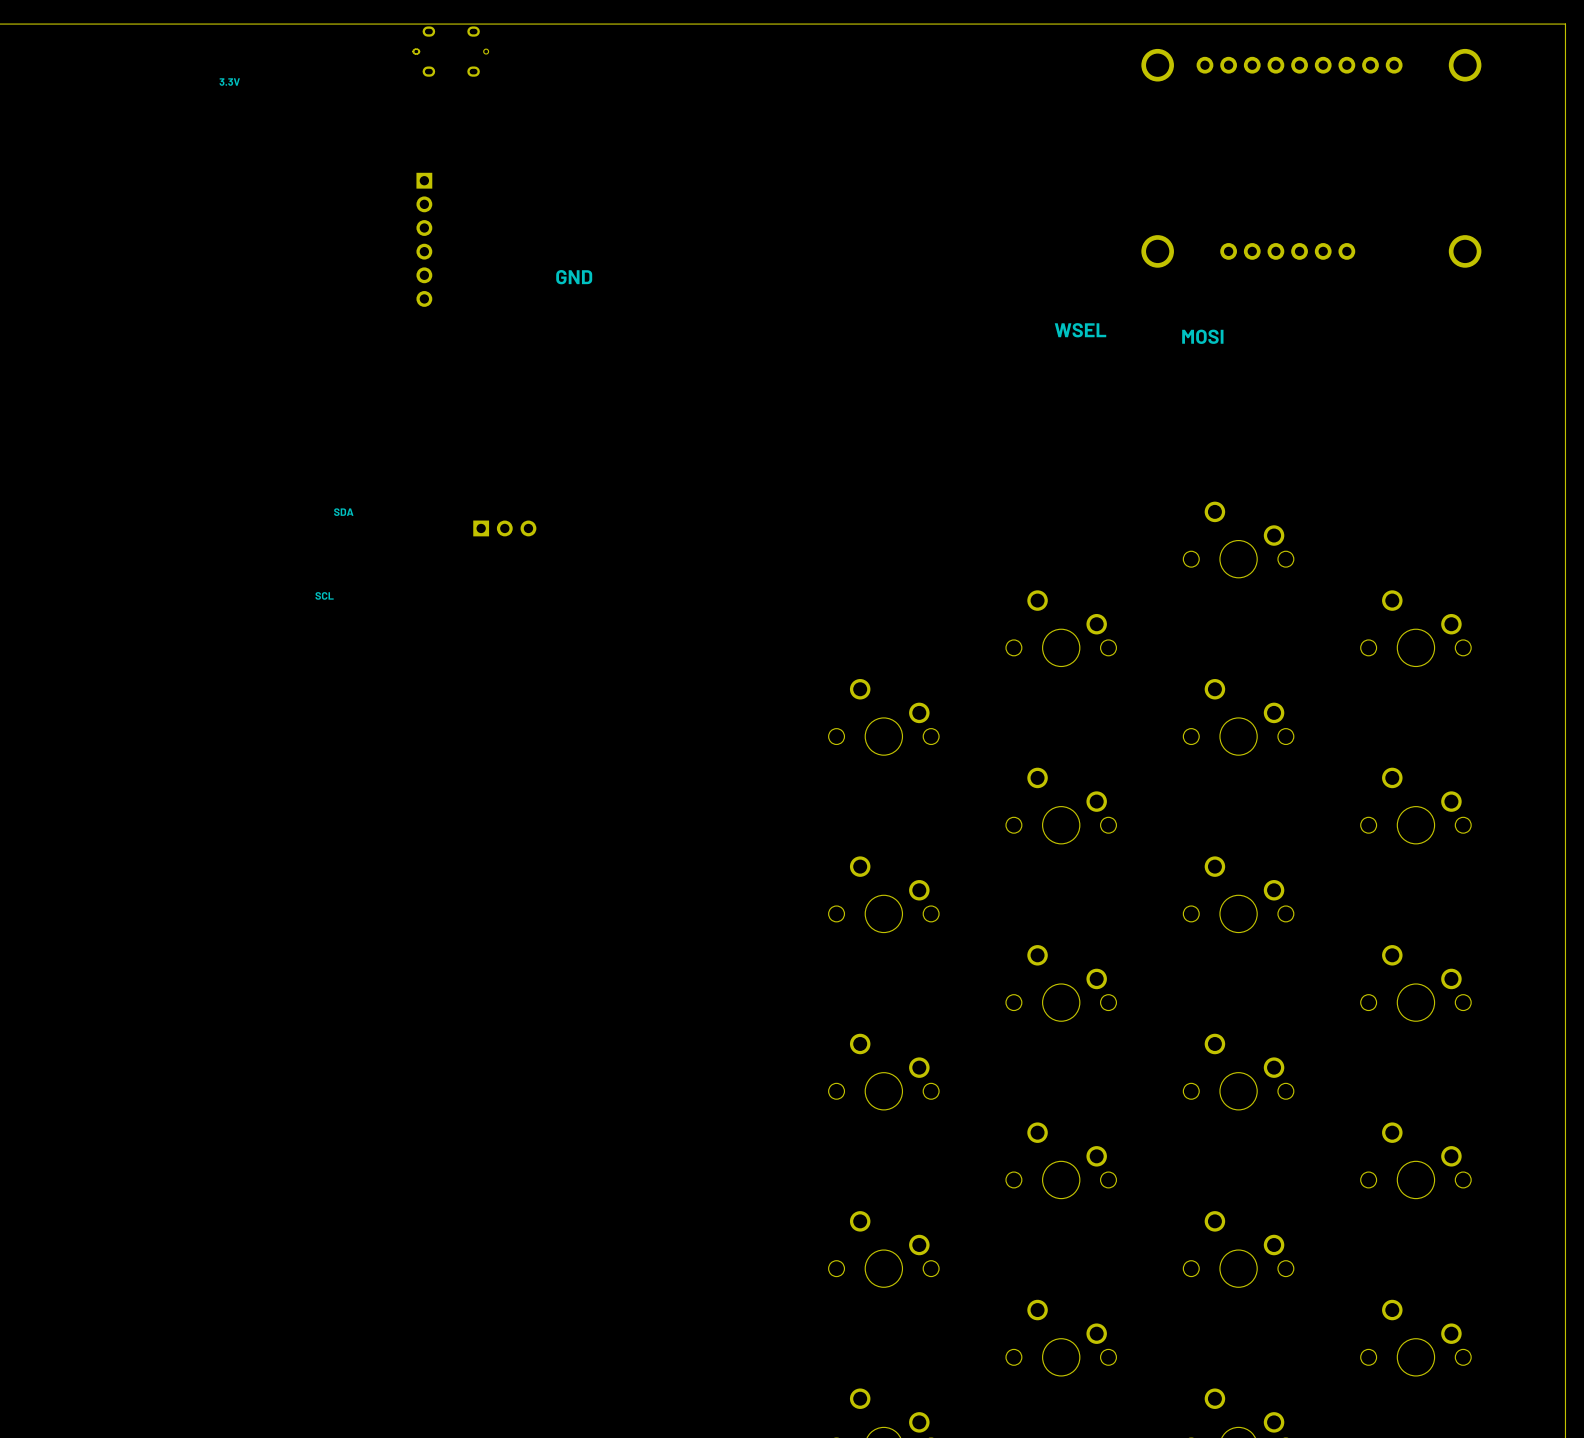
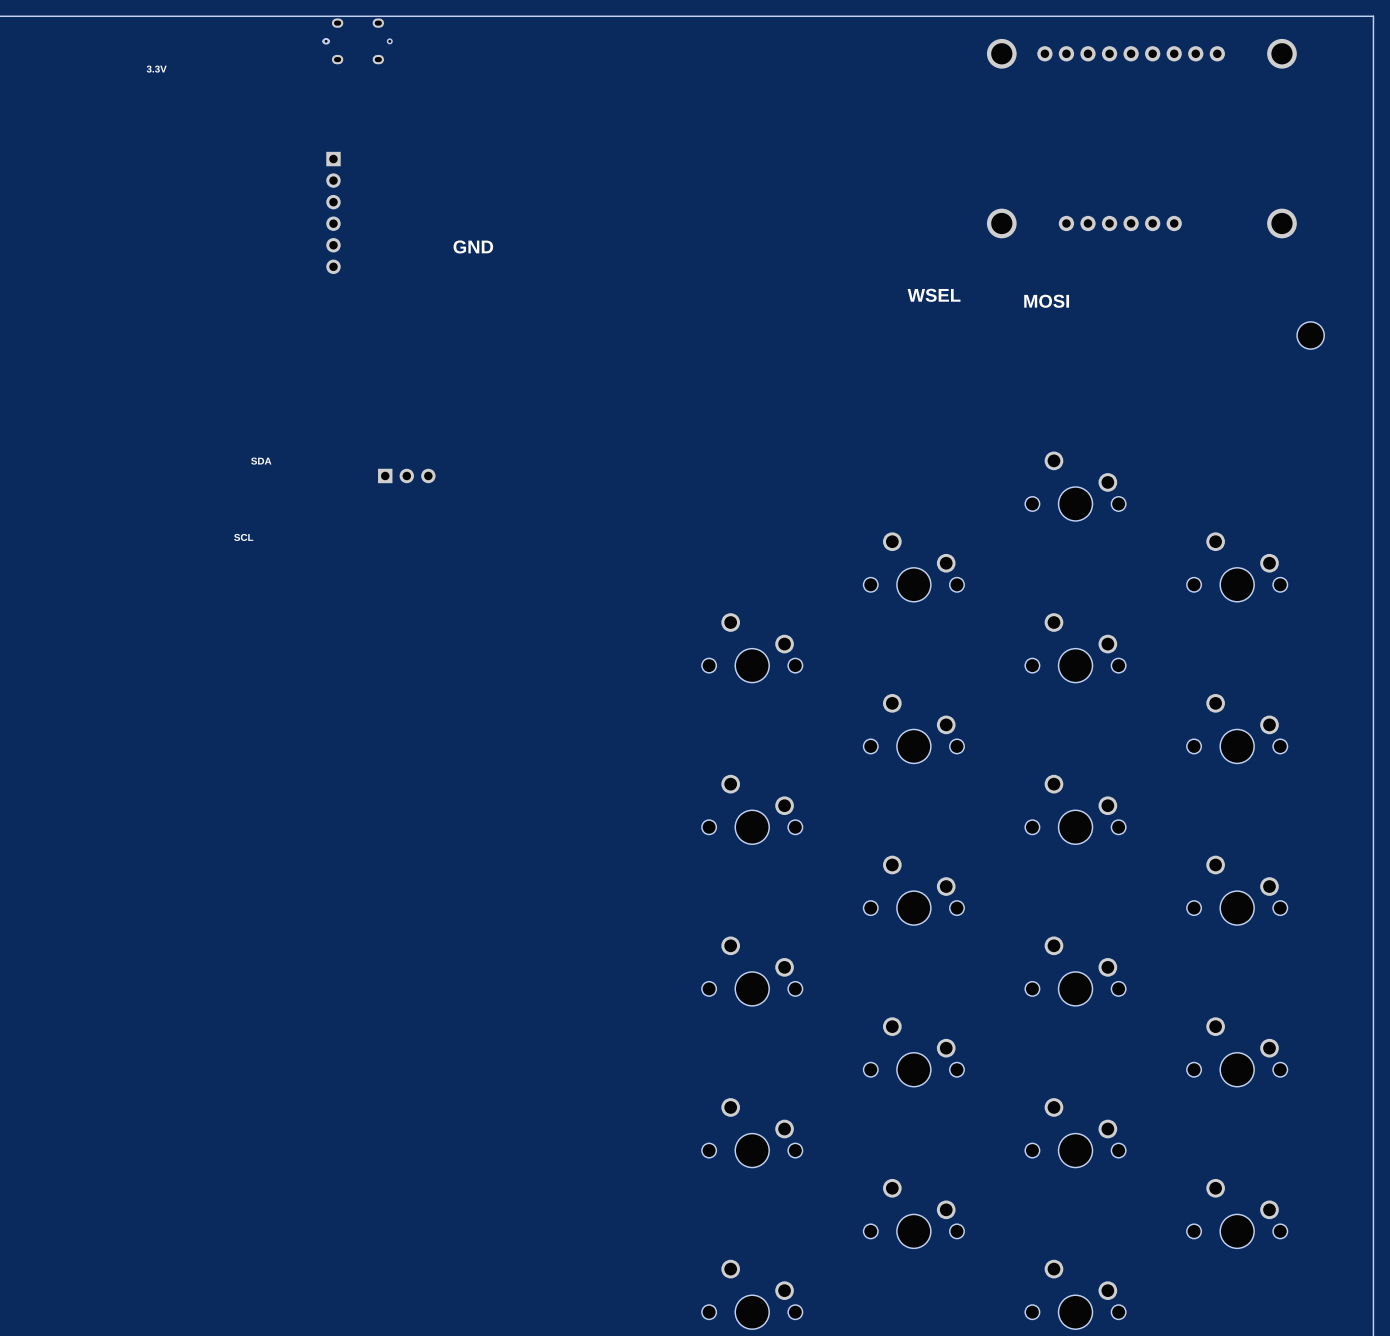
part: none -> (1310, 335)

